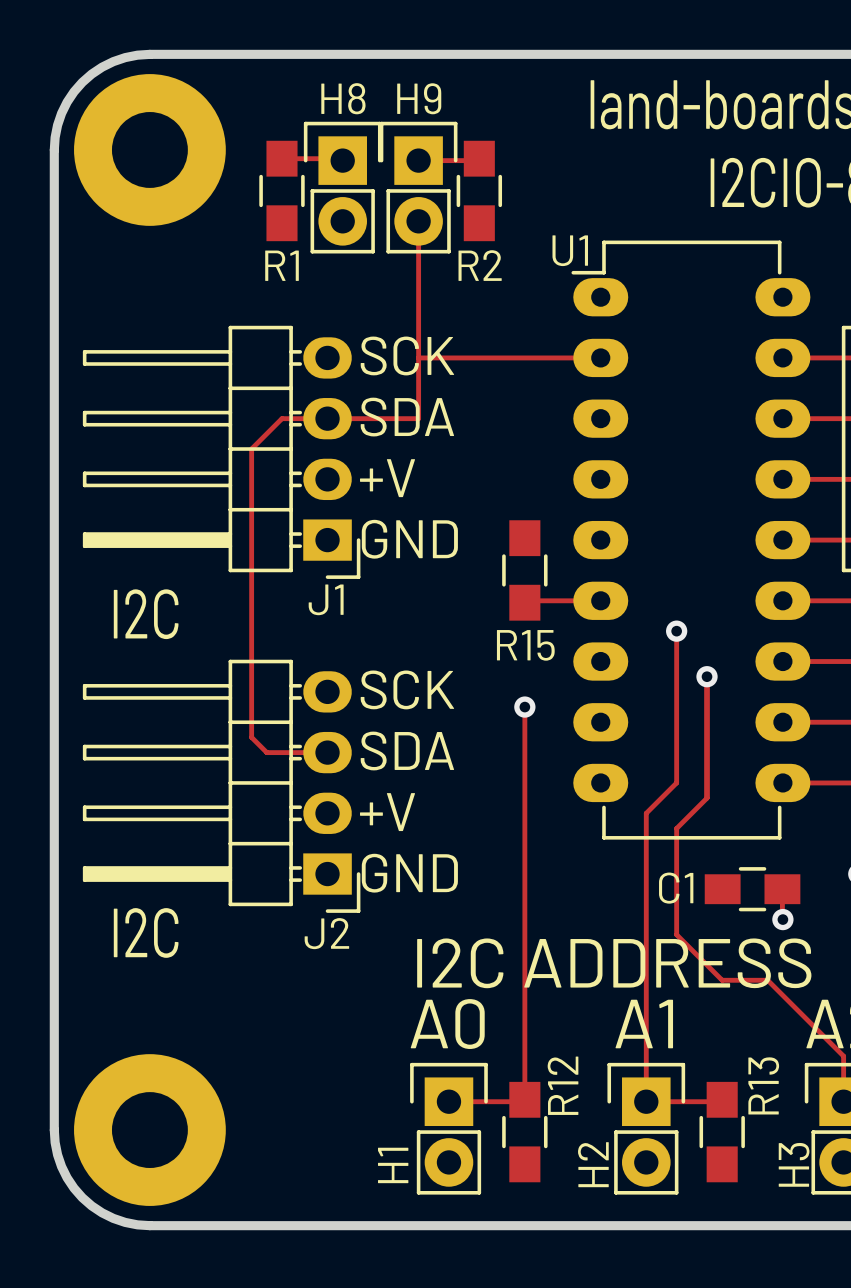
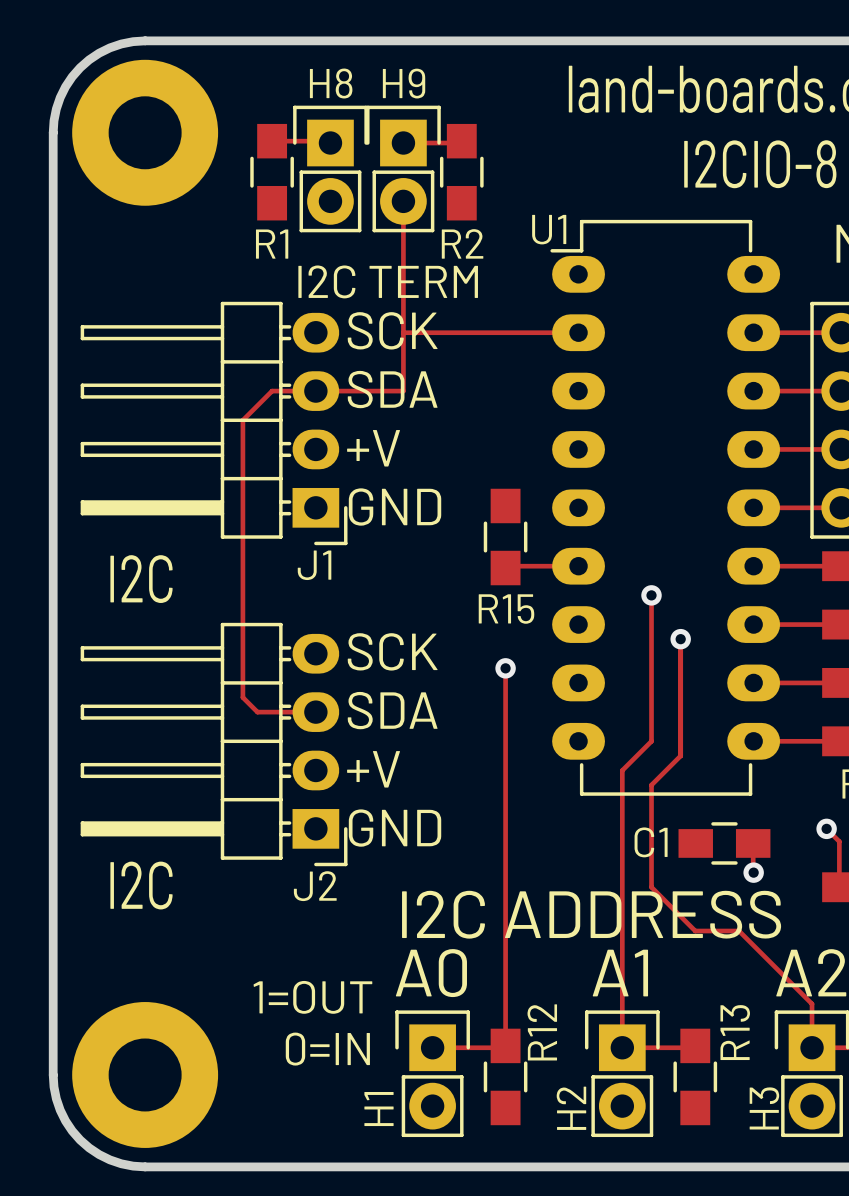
text: none -> I2C TERM (388, 281)
text: none -> 1=OUT (312, 997)
text: none -> 0=IN (327, 1049)

